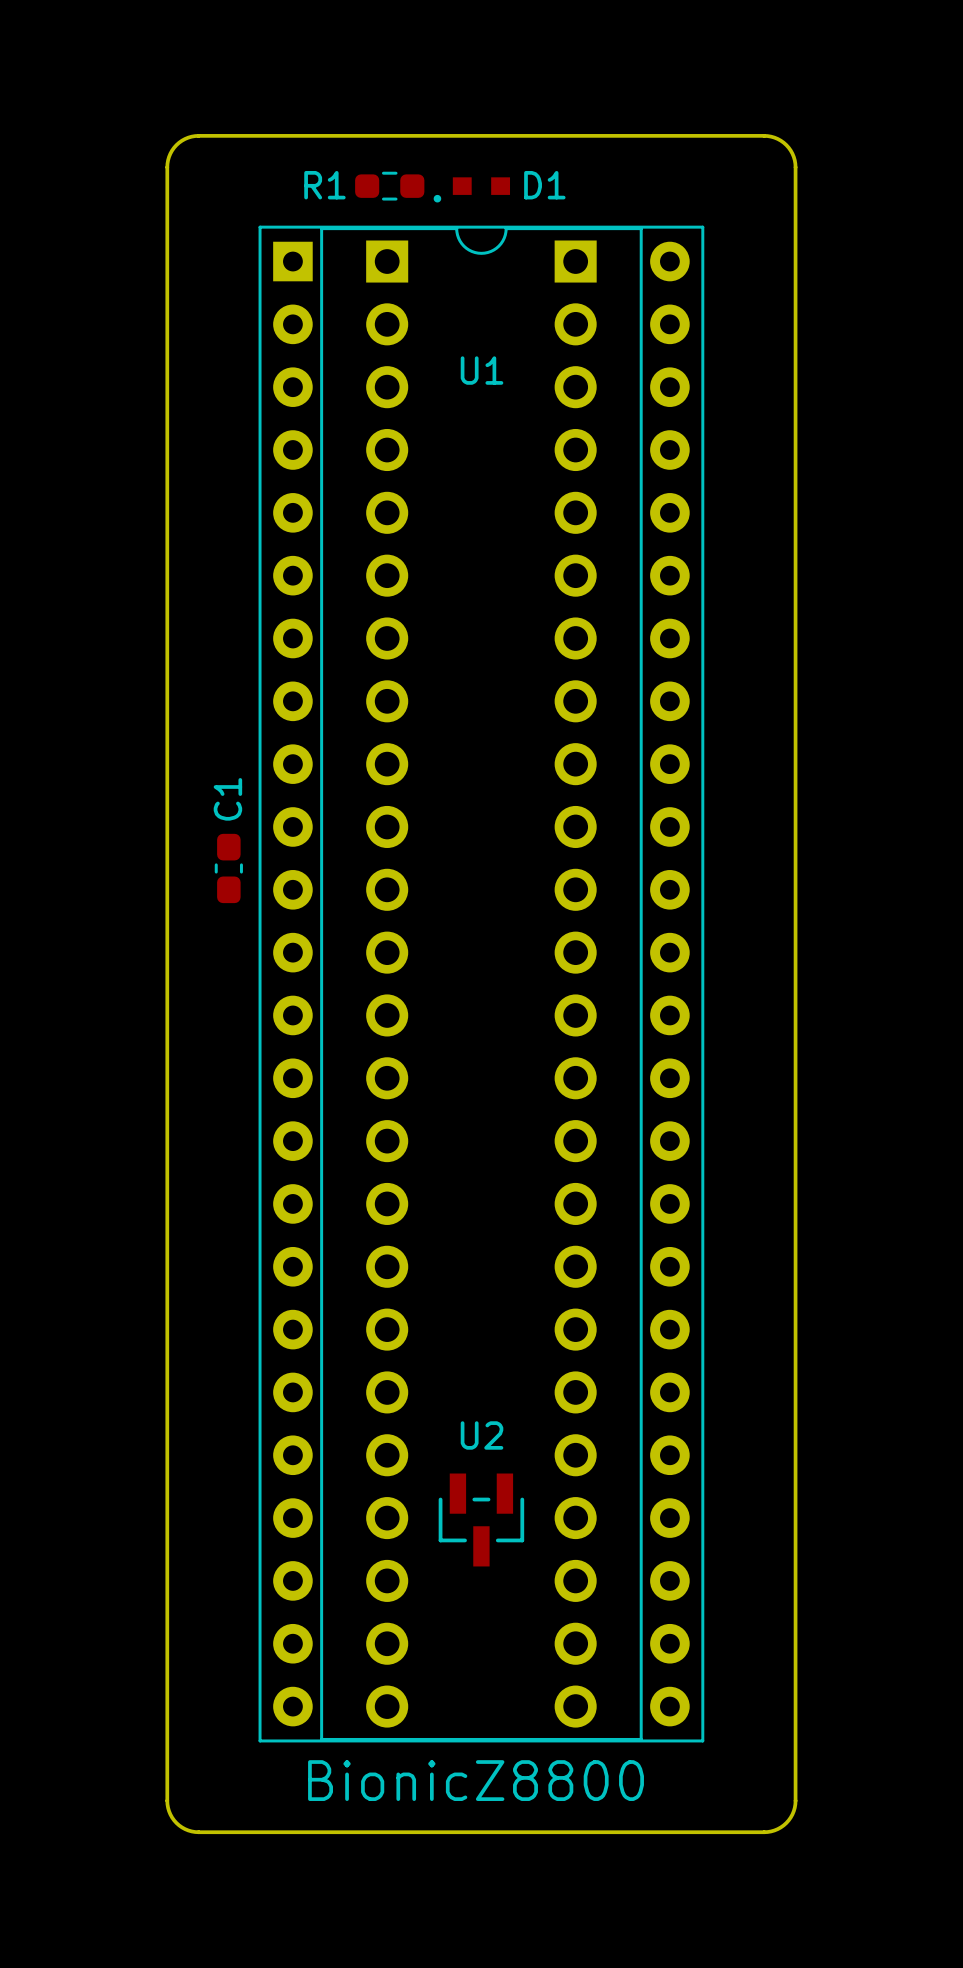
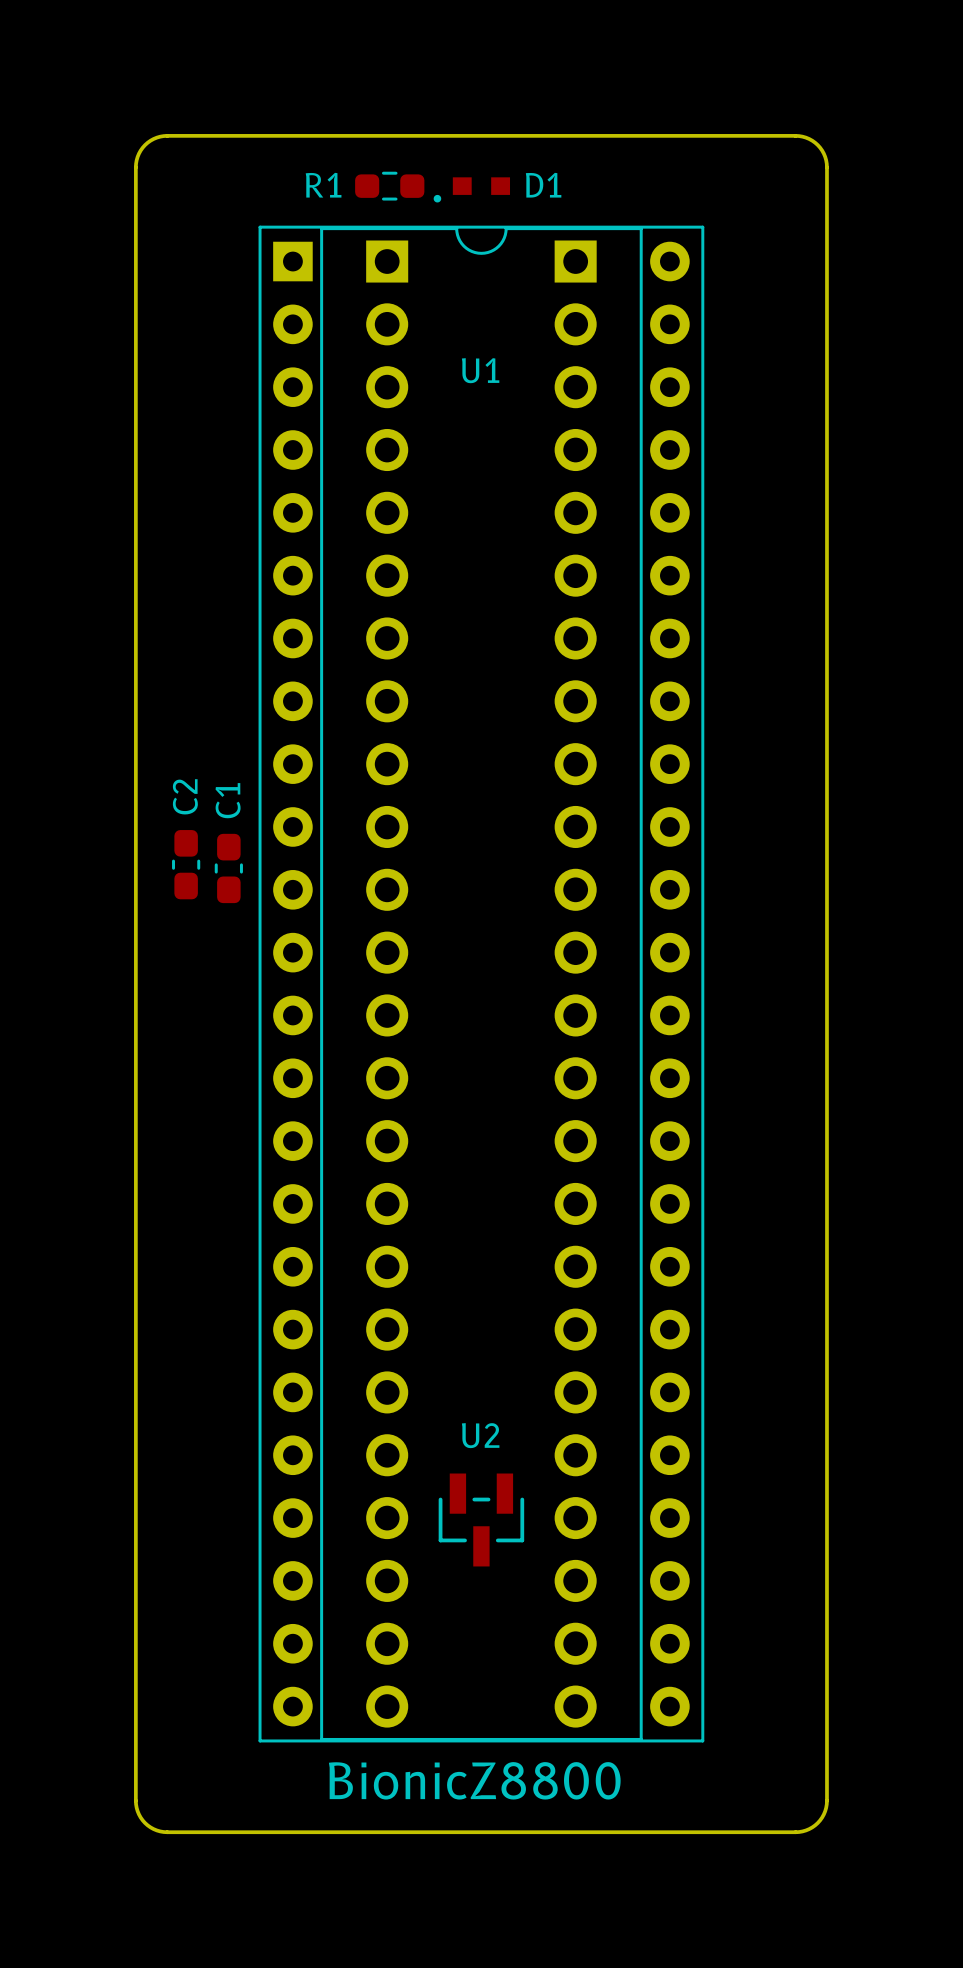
board edge: (198, 135) (188, 137) (176, 145) (169, 156) (167, 167) (167, 1800) (169, 1811) (176, 1823) (188, 1830) (198, 1832) -> (198, 135) (163, 136) (153, 138) (140, 150) (135, 167) (135, 1800) (140, 1817) (153, 1829) (163, 1832) (198, 1832)
board edge: (764, 135) (774, 137) (786, 145) (793, 156) (795, 167) (795, 1800) (793, 1811) (786, 1823) (774, 1830) (764, 1832) -> (764, 135) (799, 136) (809, 138) (822, 150) (826, 167) (826, 1800) (822, 1817) (809, 1829) (799, 1832) (764, 1832)
C2: none -> (186, 864)

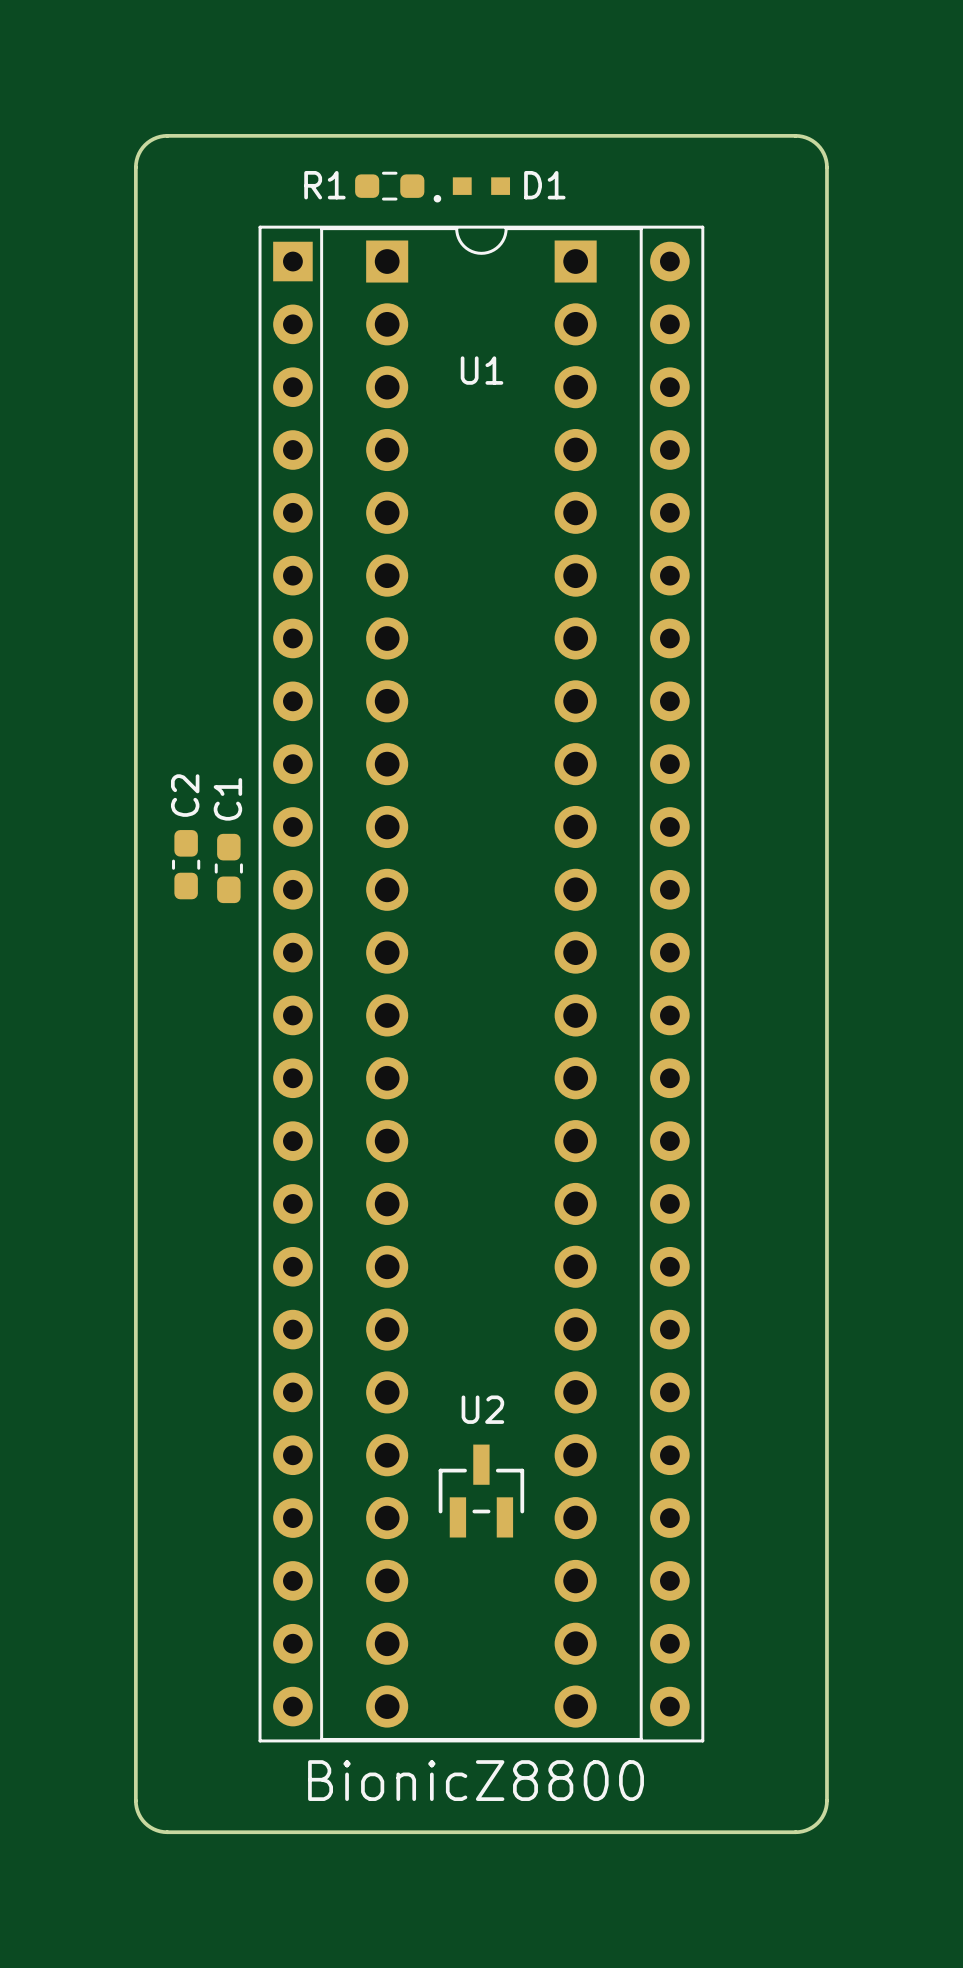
U2 rotation: 0° (481, 1519) -> 180° (481, 1491)

